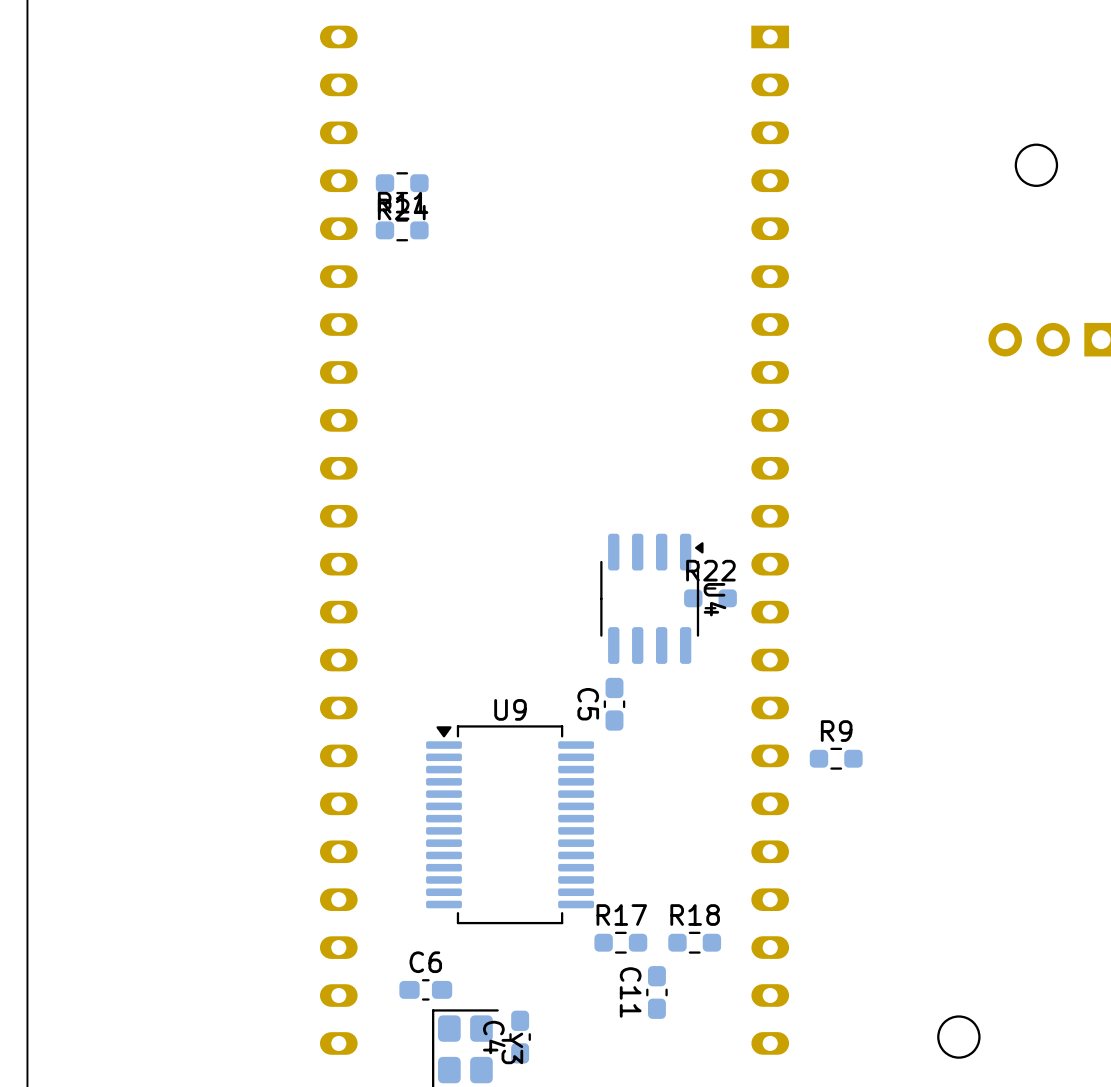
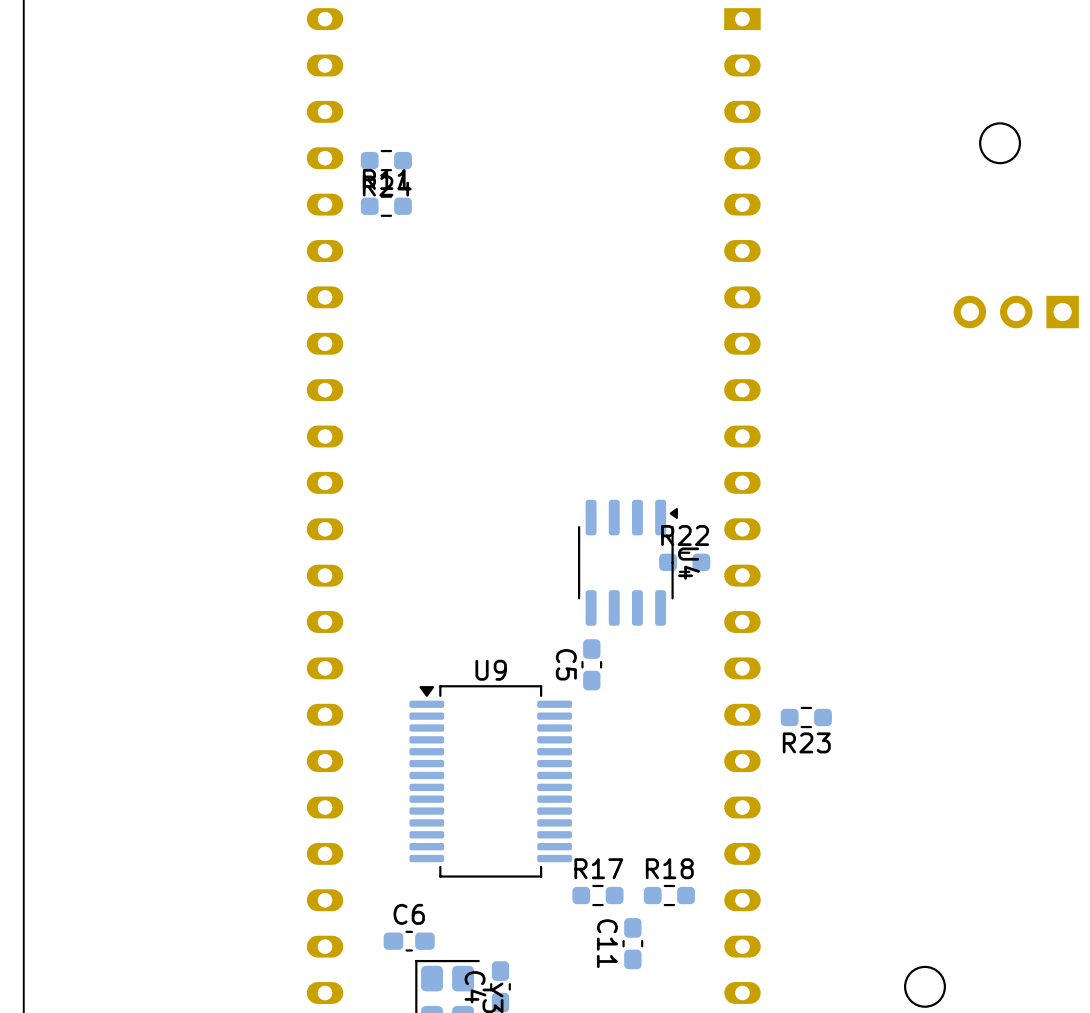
R9 name: R9 (836, 731) -> R23 (806, 742)

